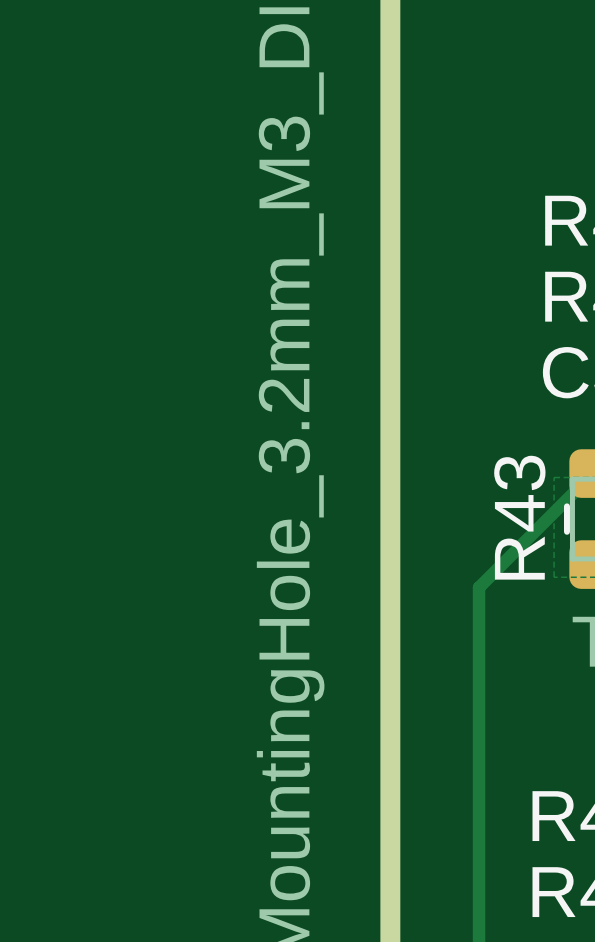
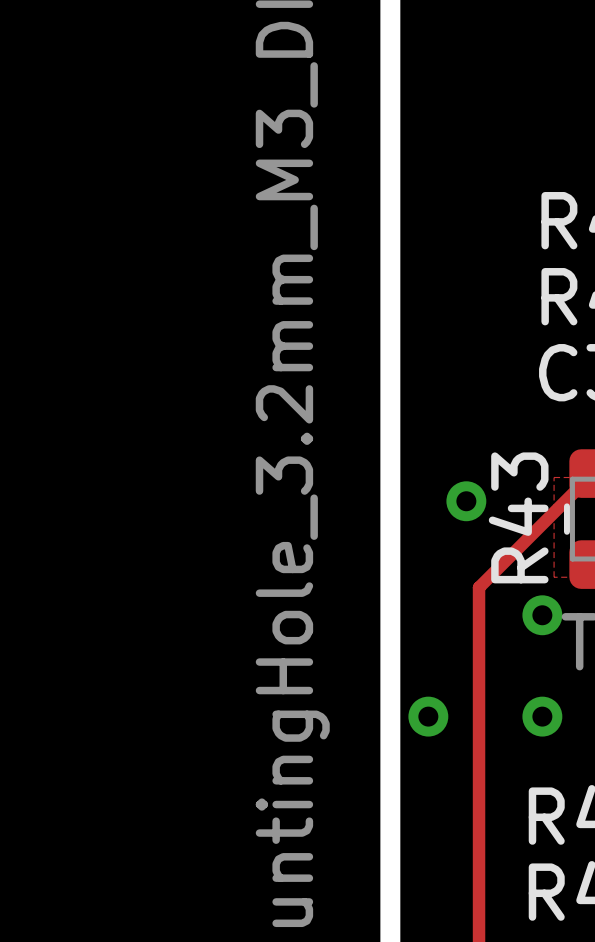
via: none -> (466, 501)
via: none -> (542, 615)
via: none -> (428, 716)
via: none -> (542, 716)

